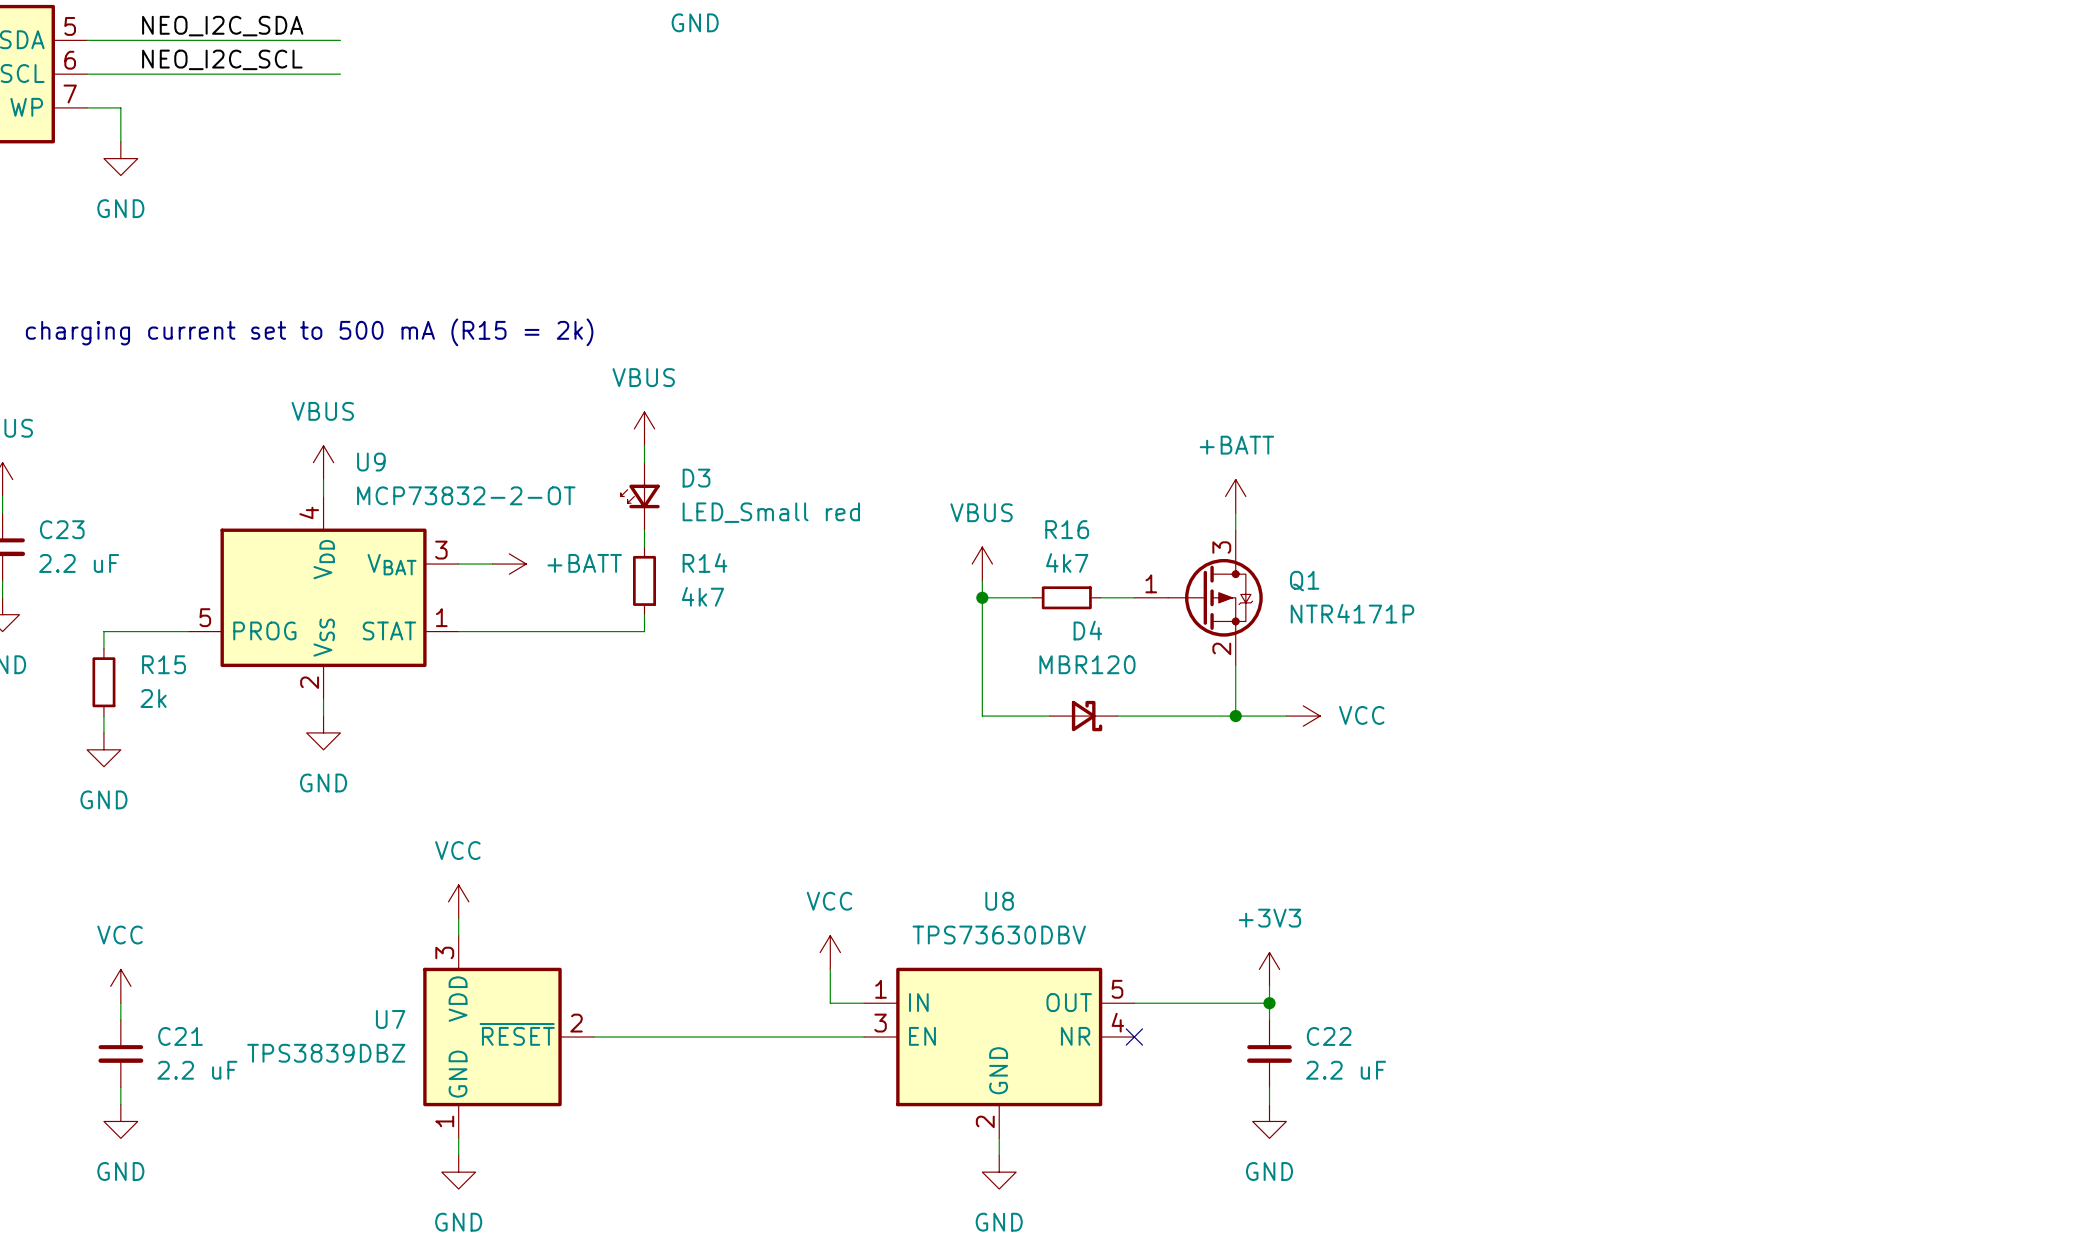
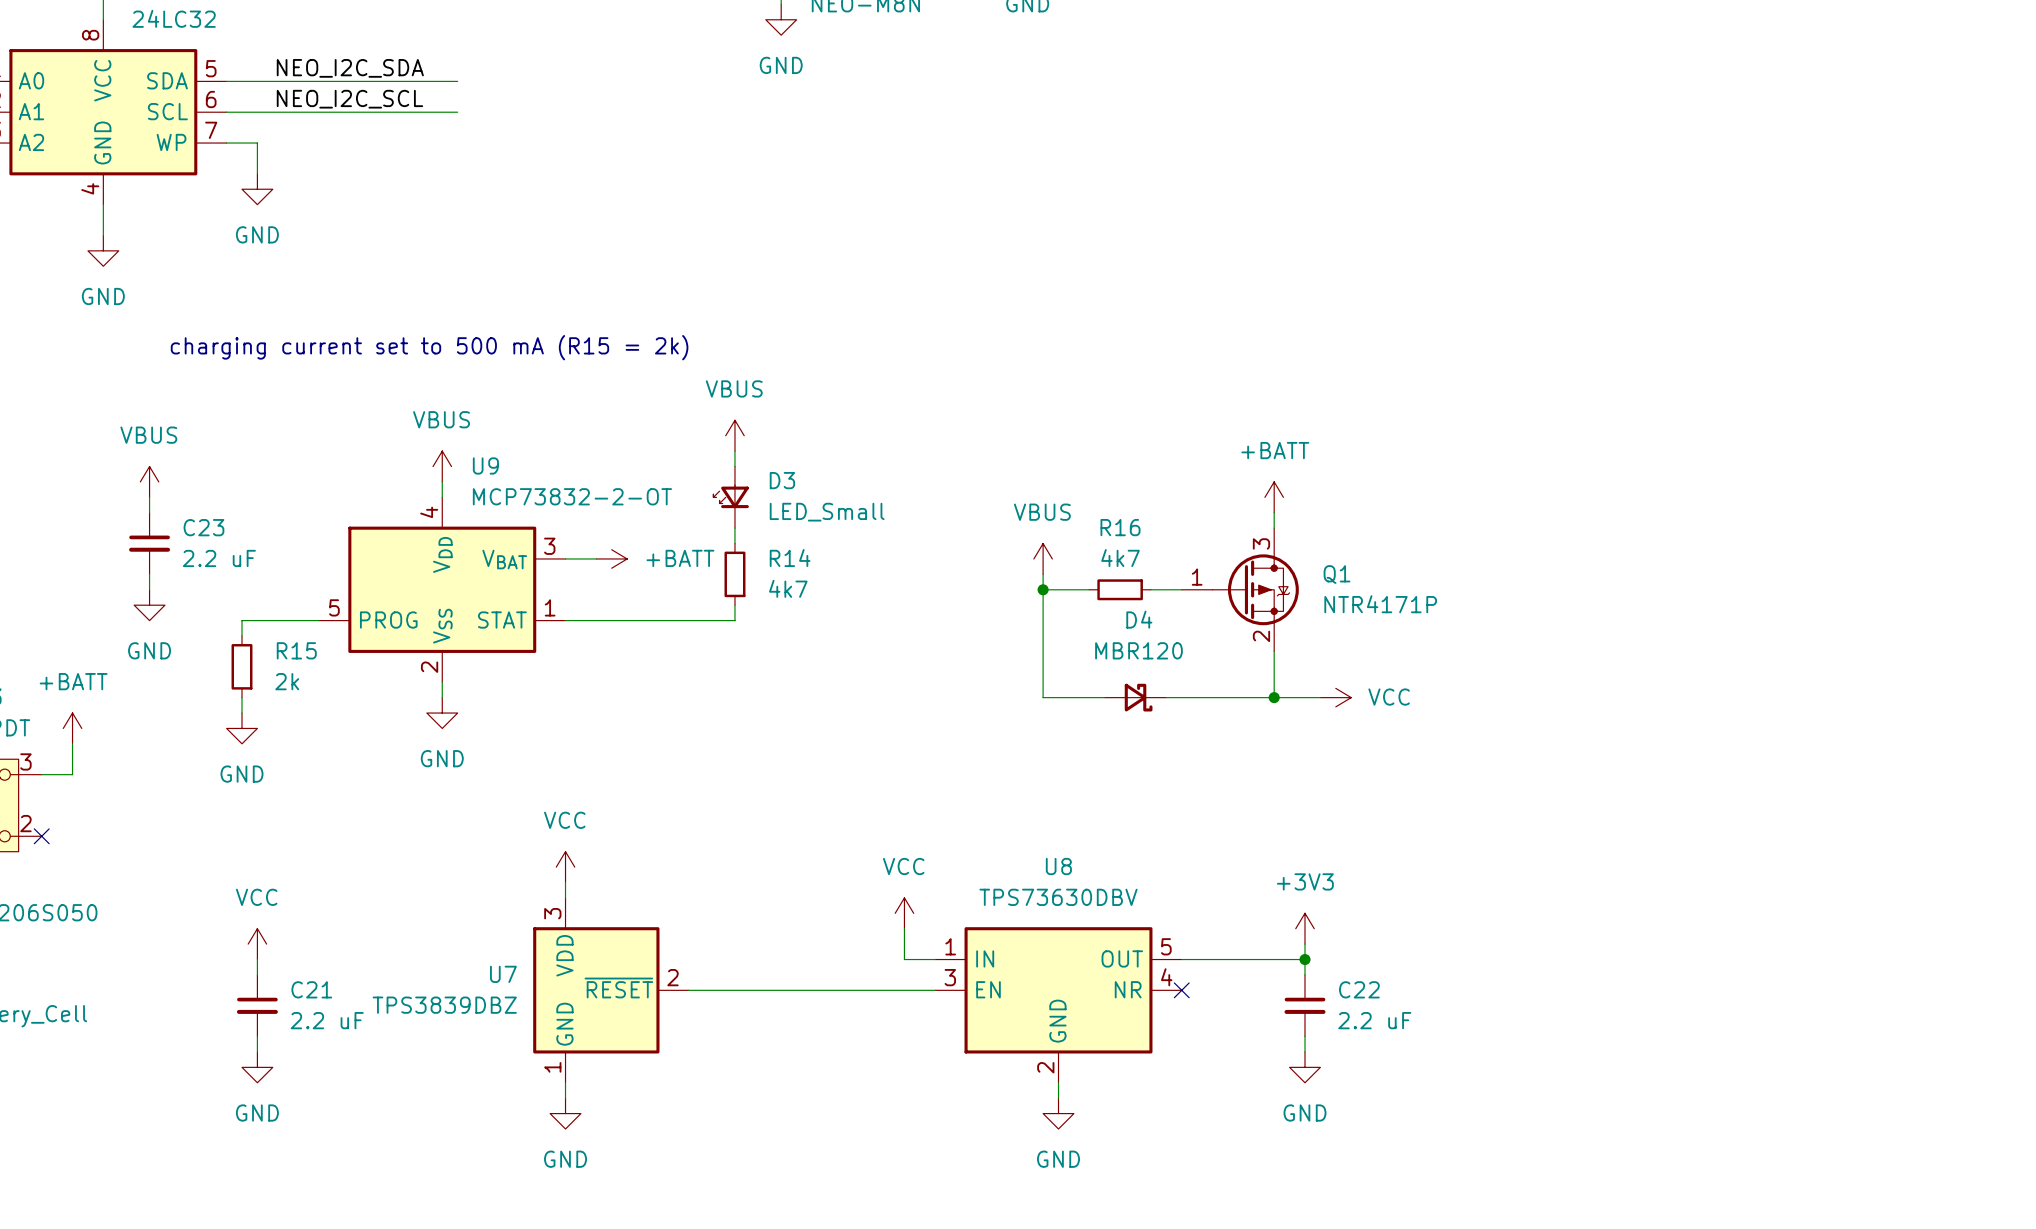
D3 value: LED_Small red (771, 512) -> LED_Small (827, 512)

